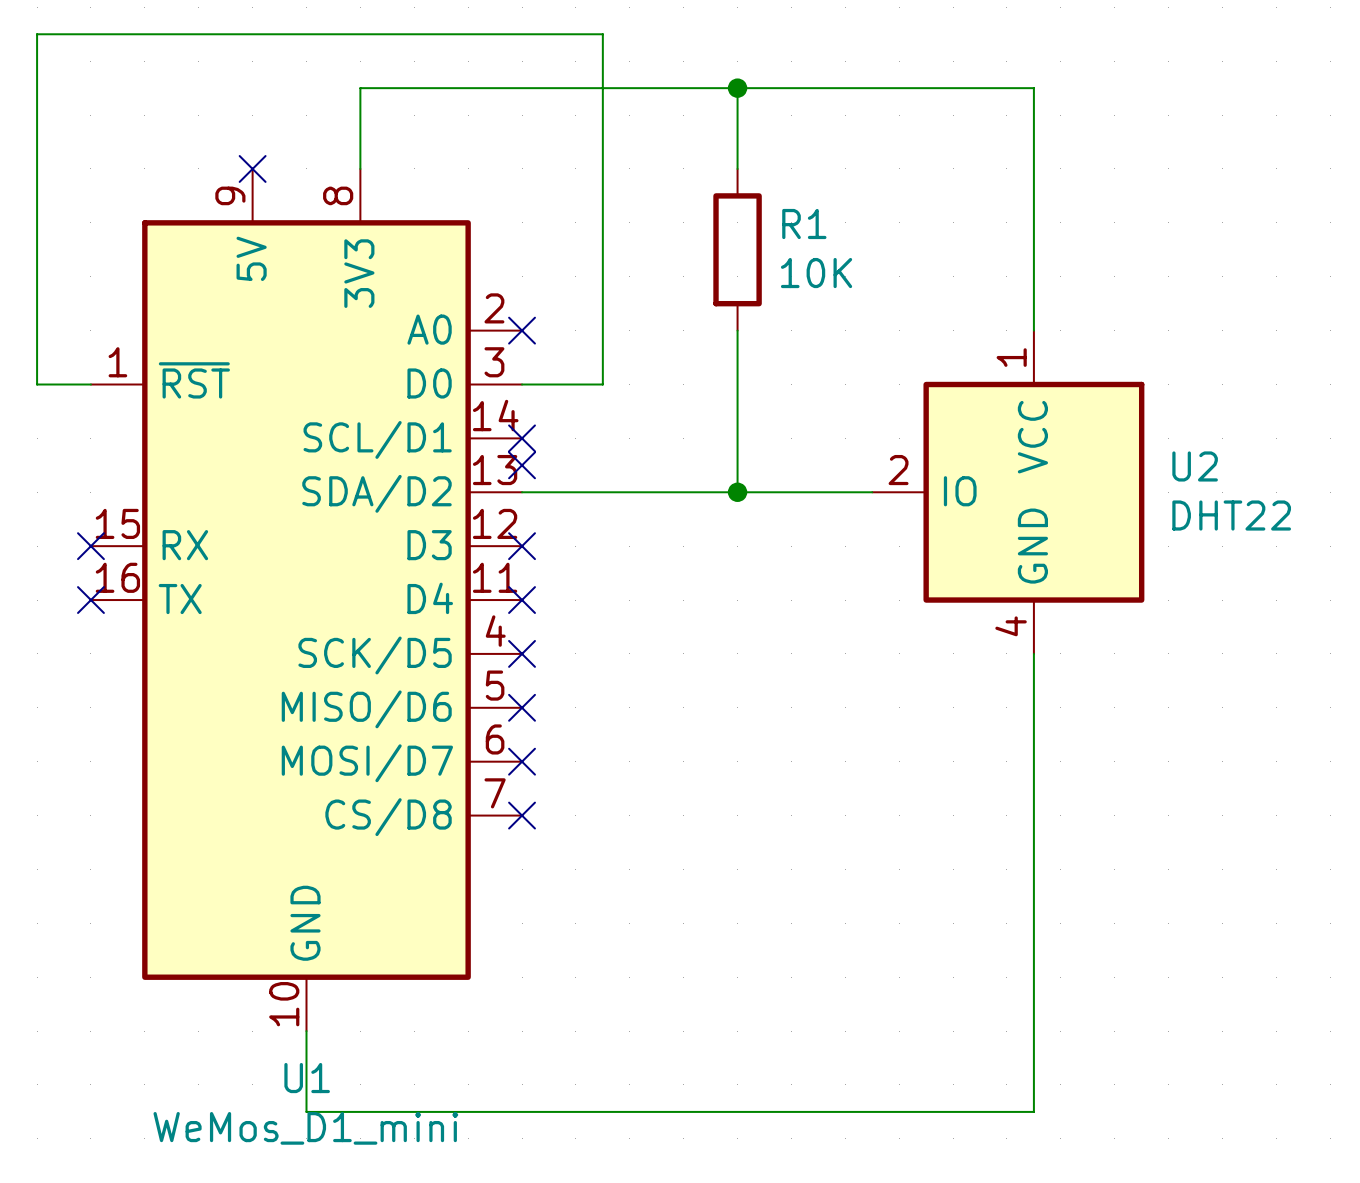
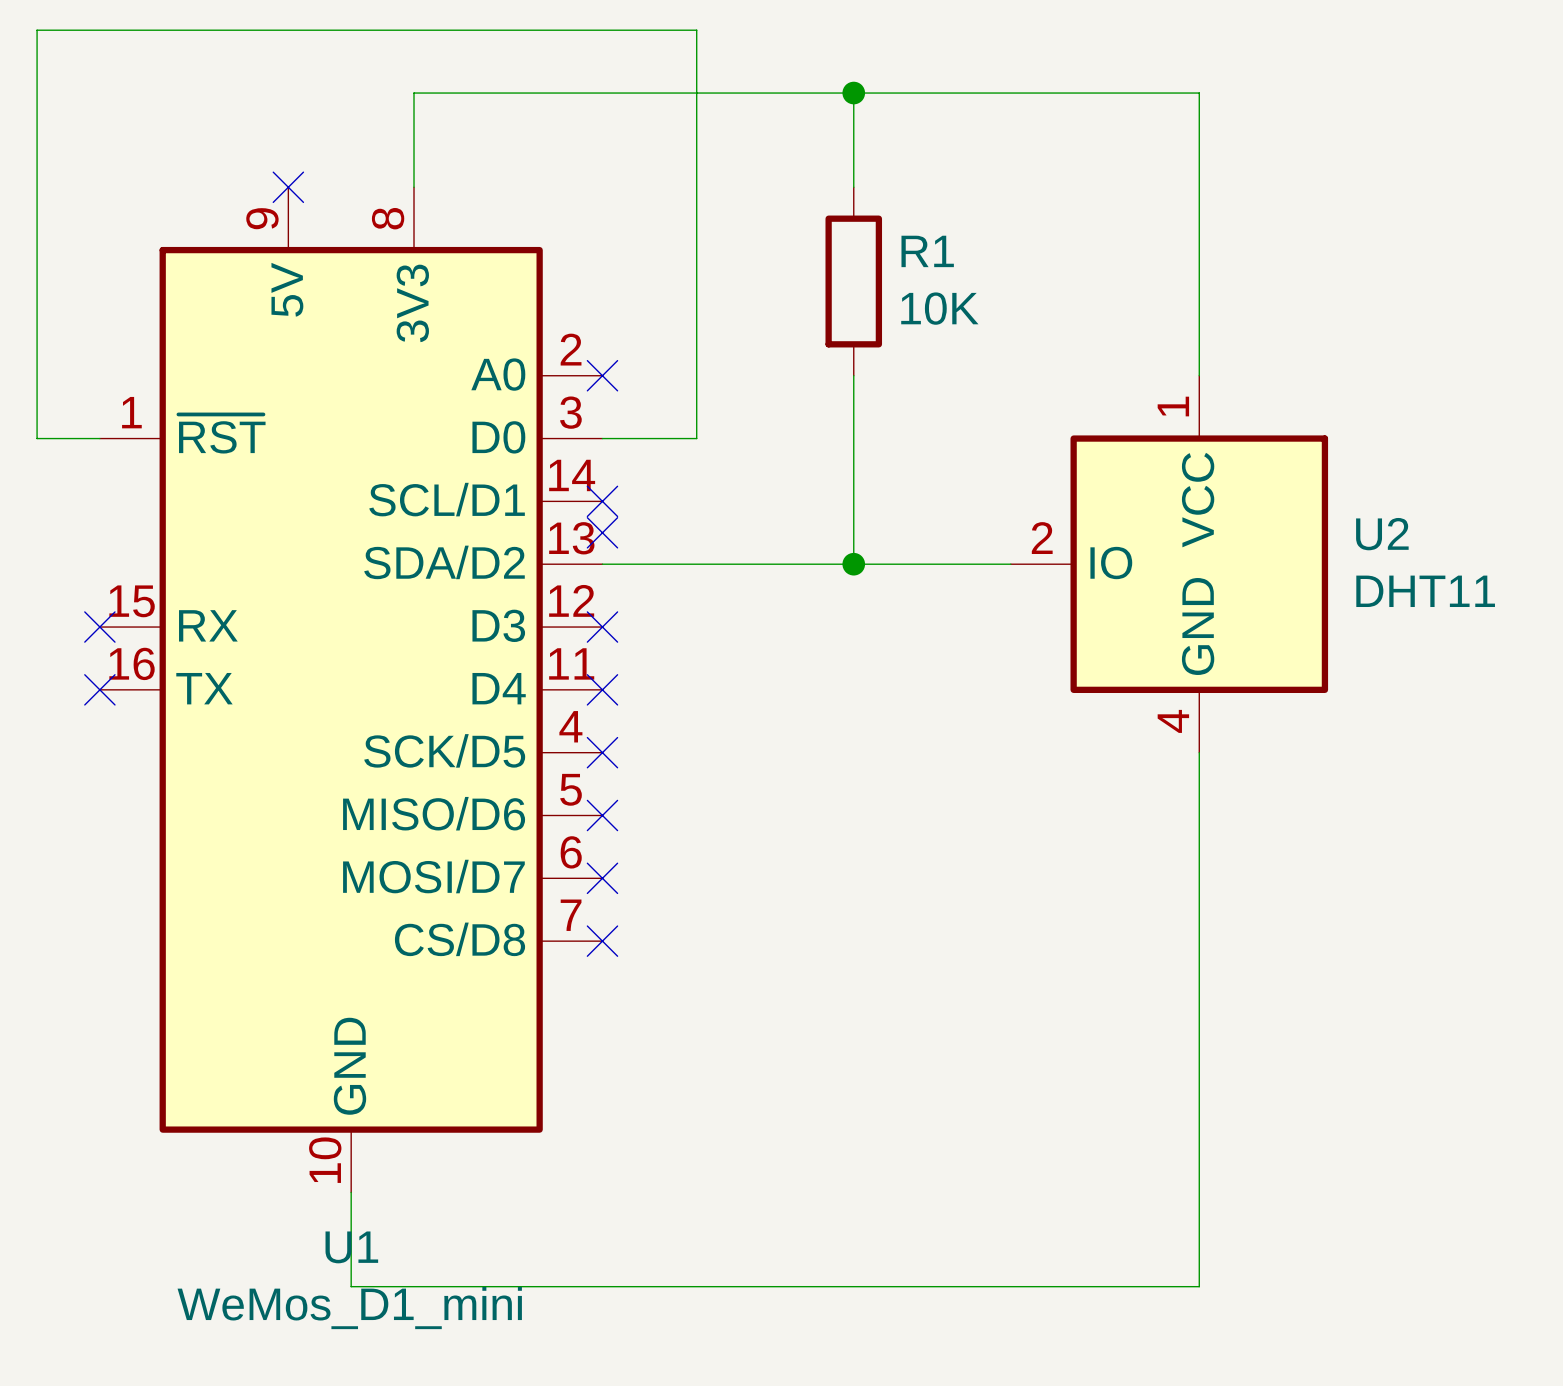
U2 value: DHT22 (1231, 515) -> DHT11 (1425, 591)

